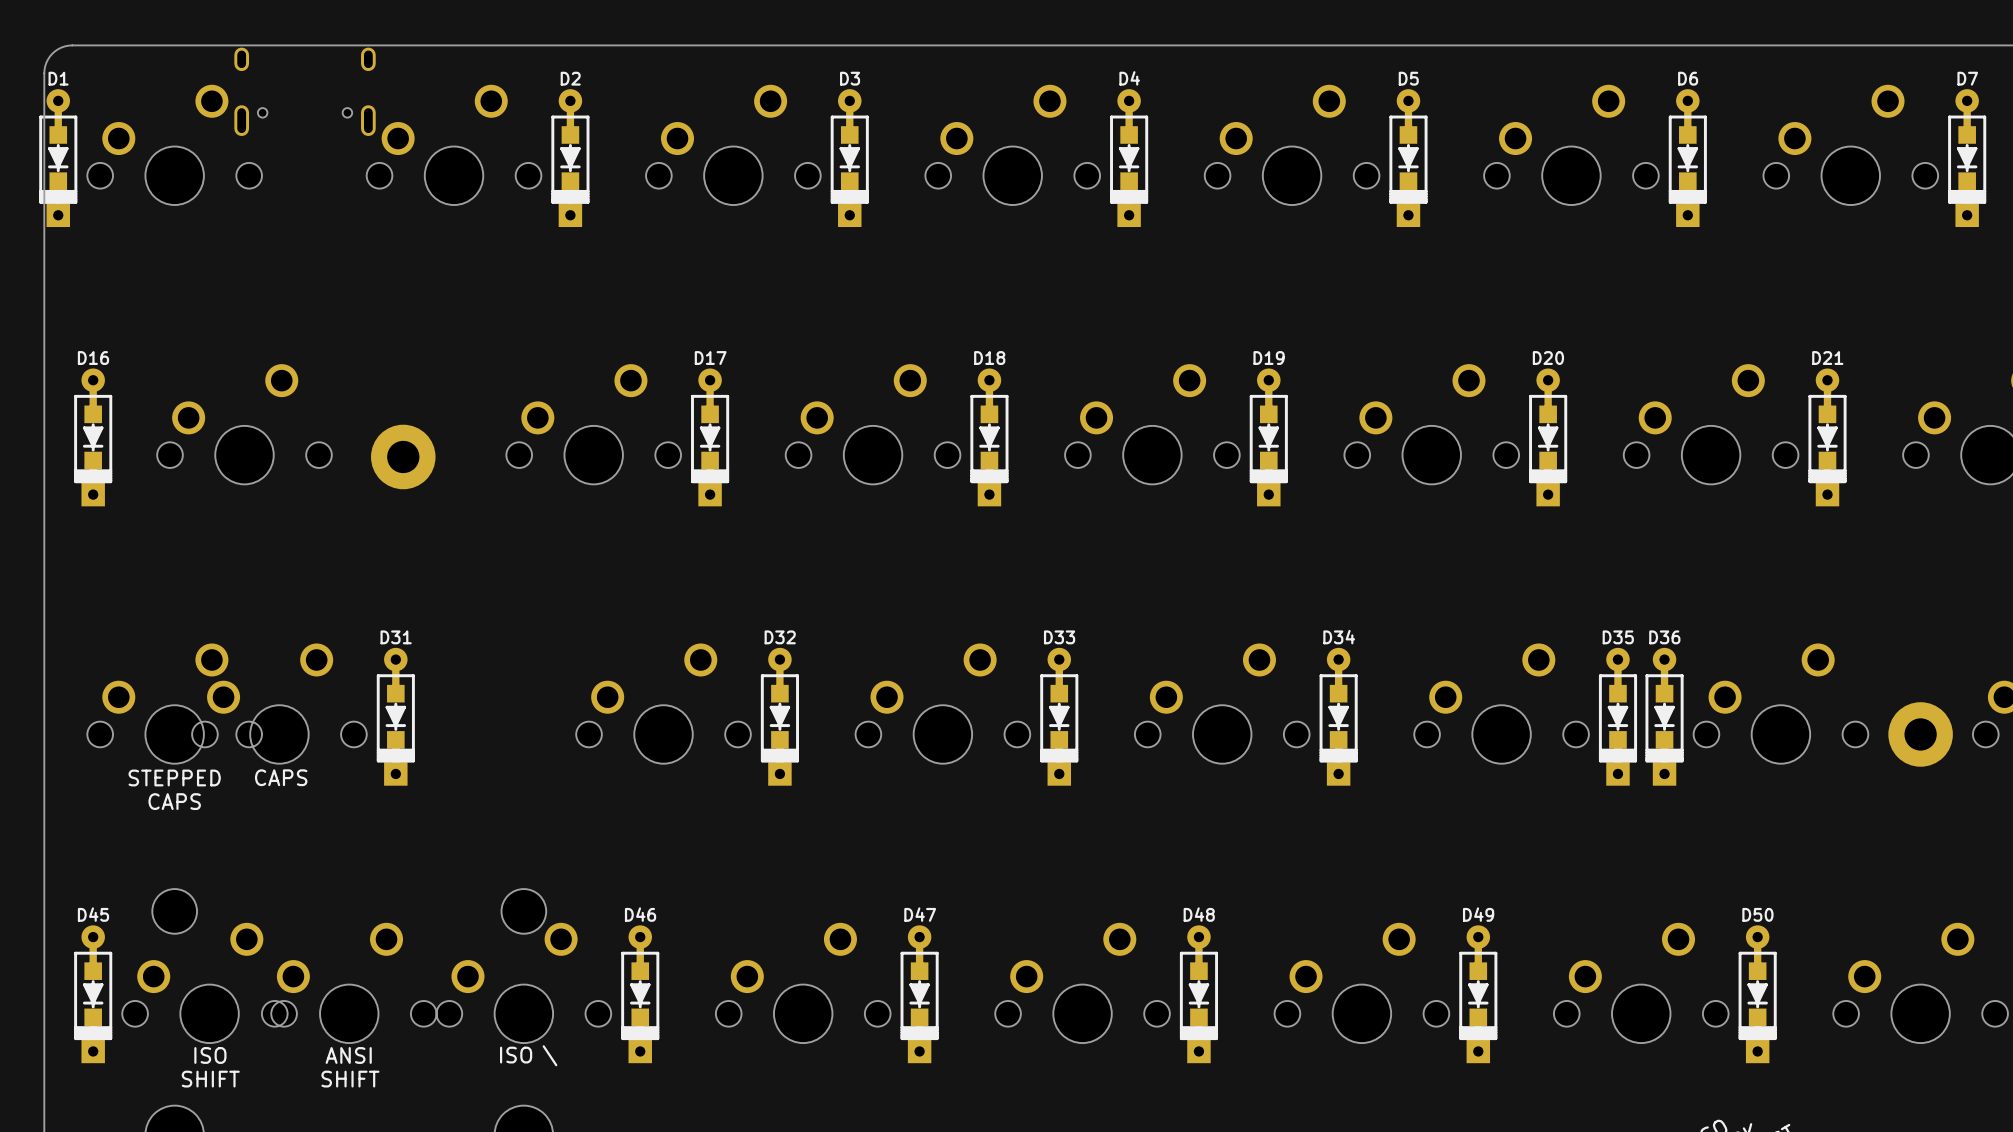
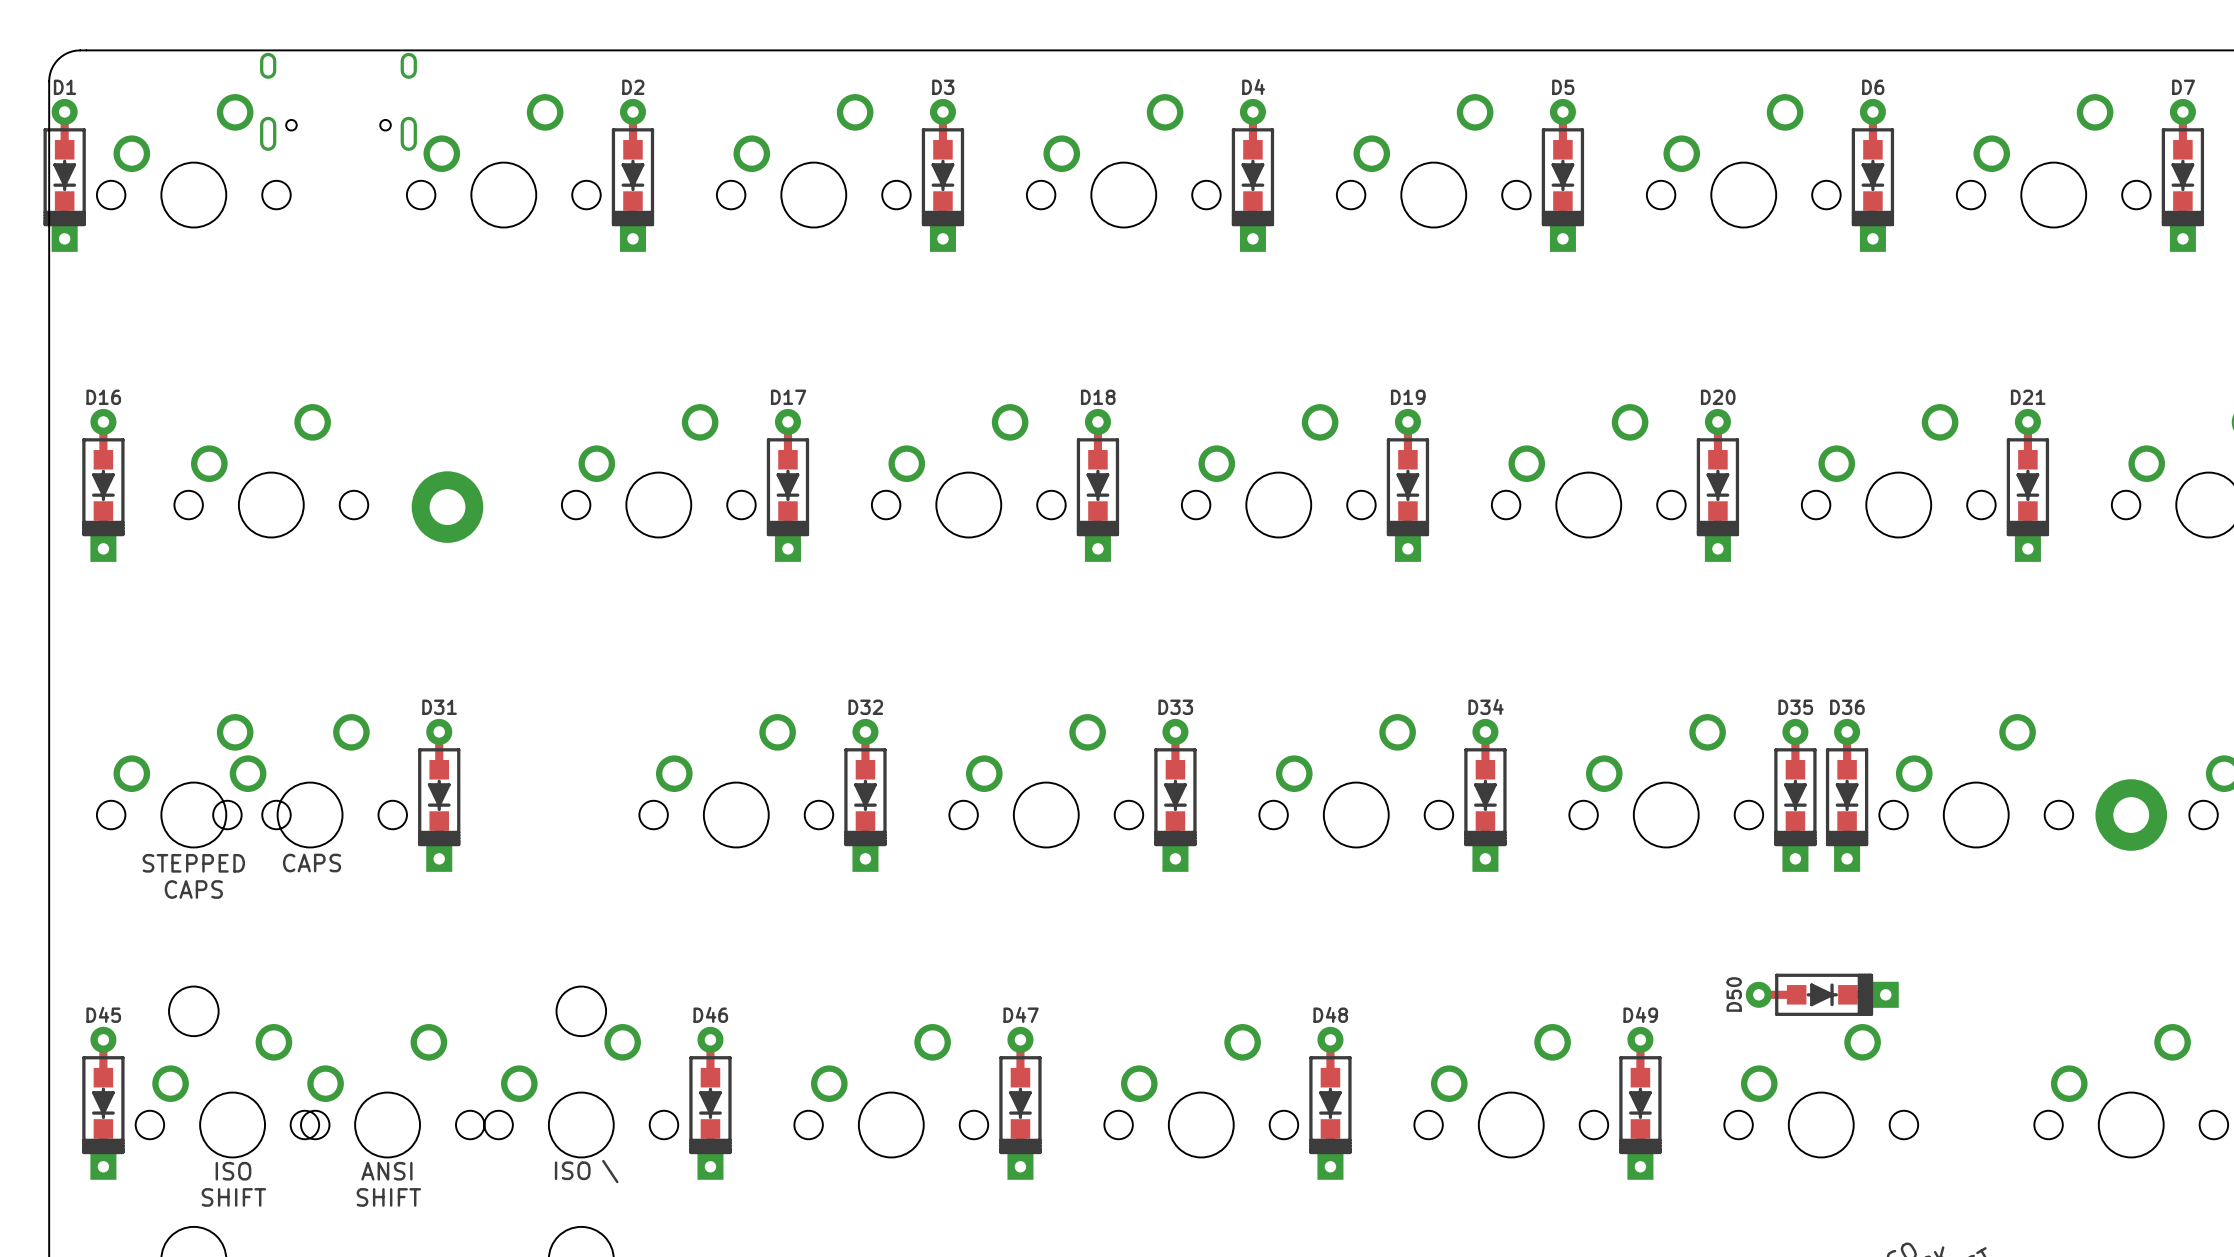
D50 rotation: 0° (1757, 994) -> 90° counterclockwise (1822, 994)
D50 position: (1757, 994) -> (1822, 994)

